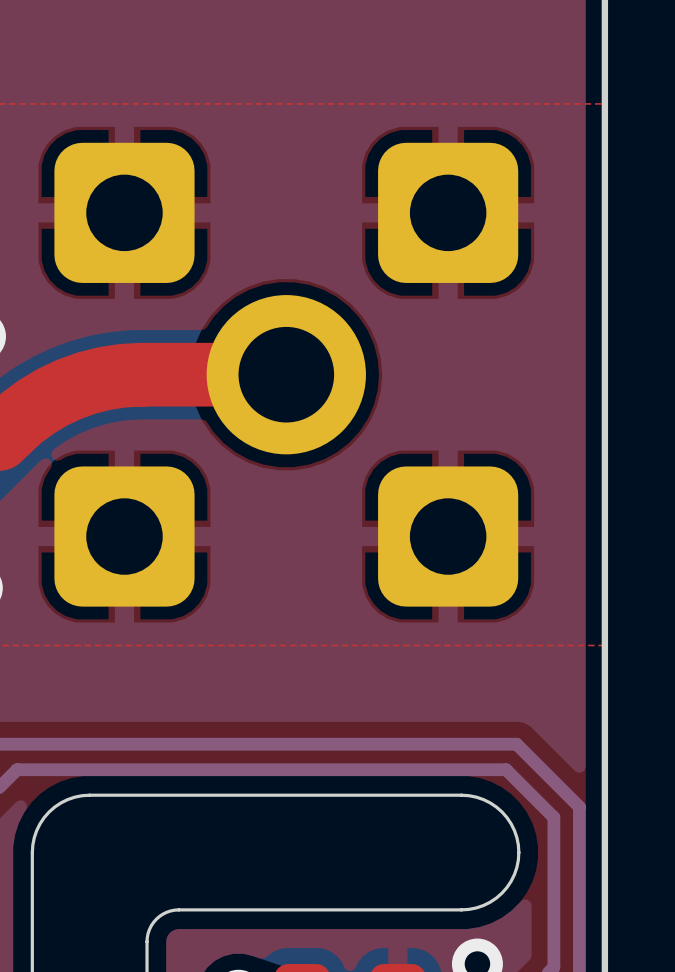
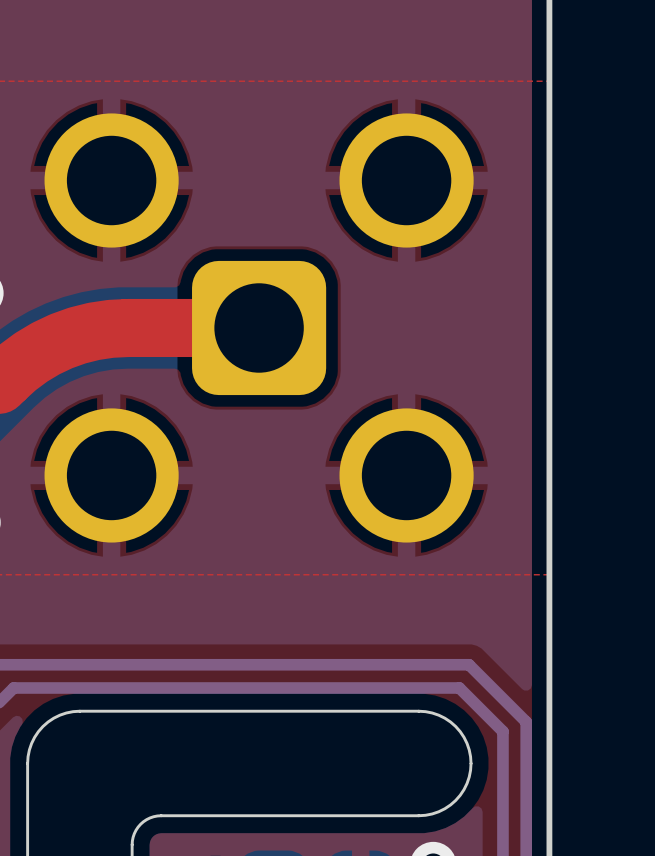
part footprint: [54, 142, 519, 607] -> [44, 113, 474, 543]

